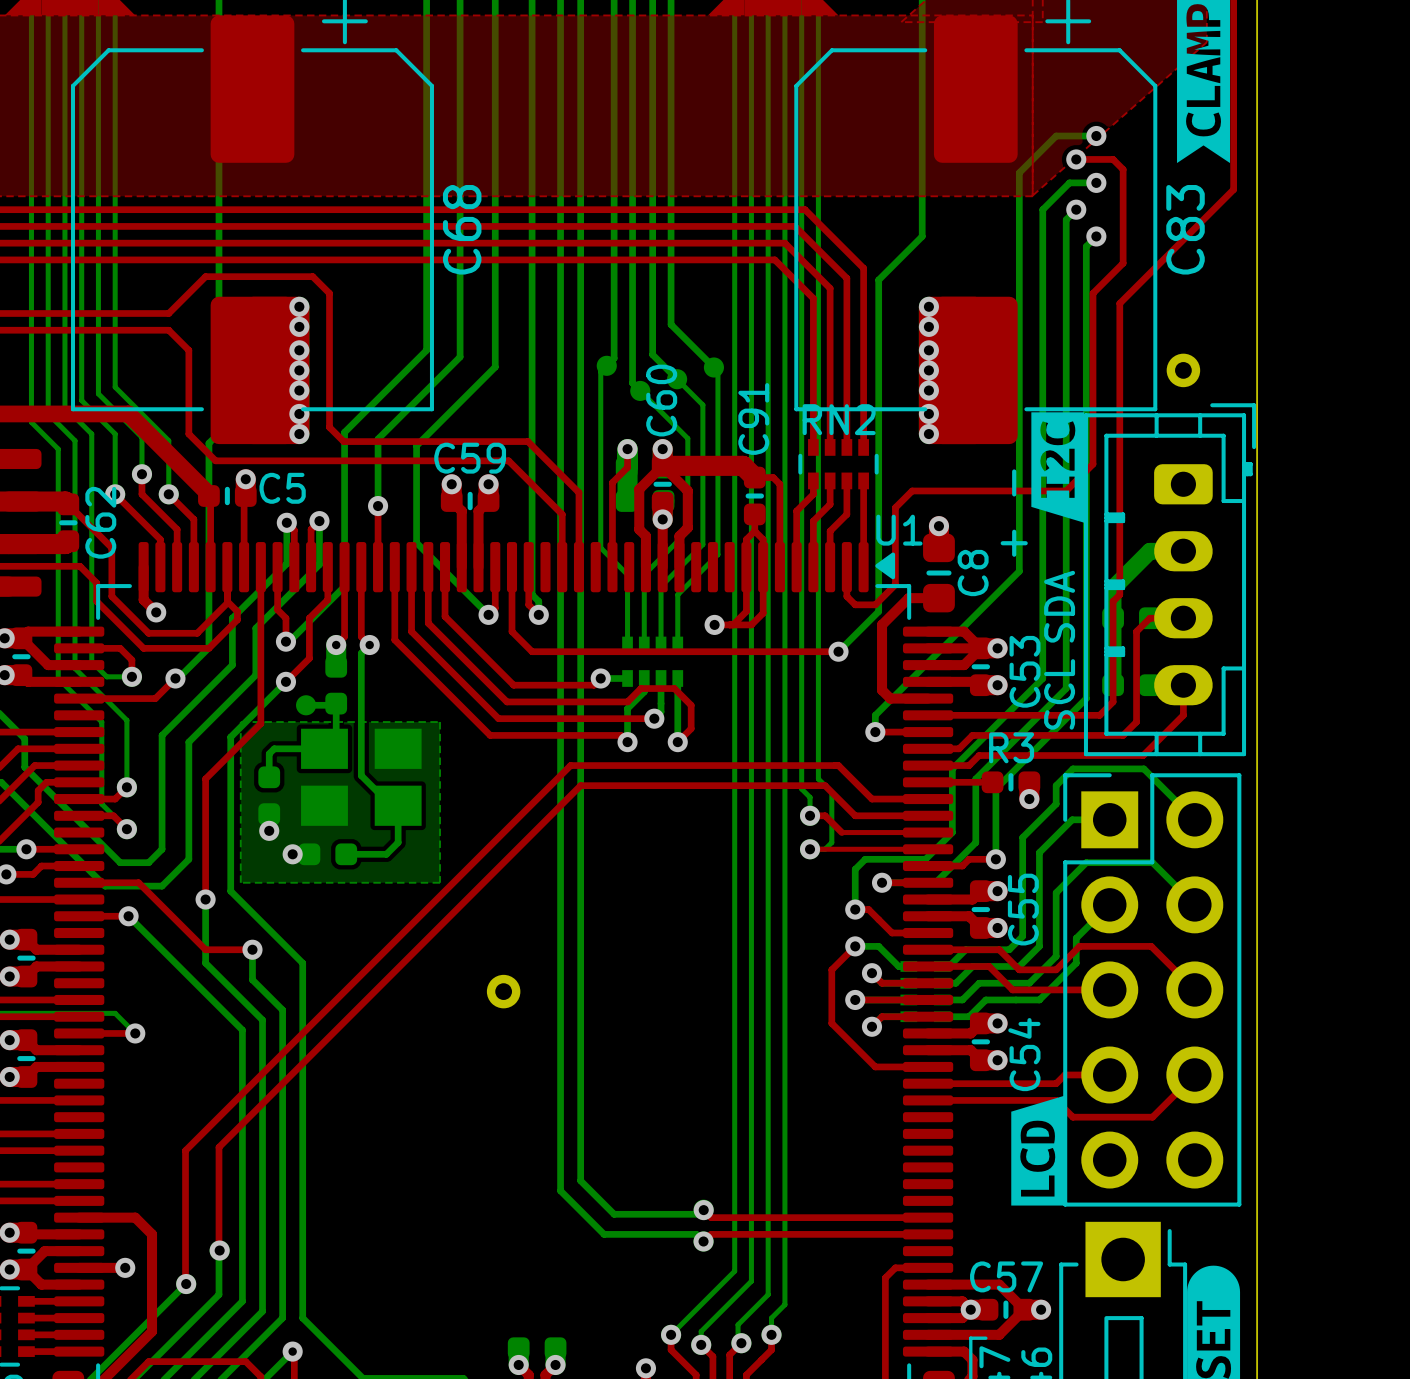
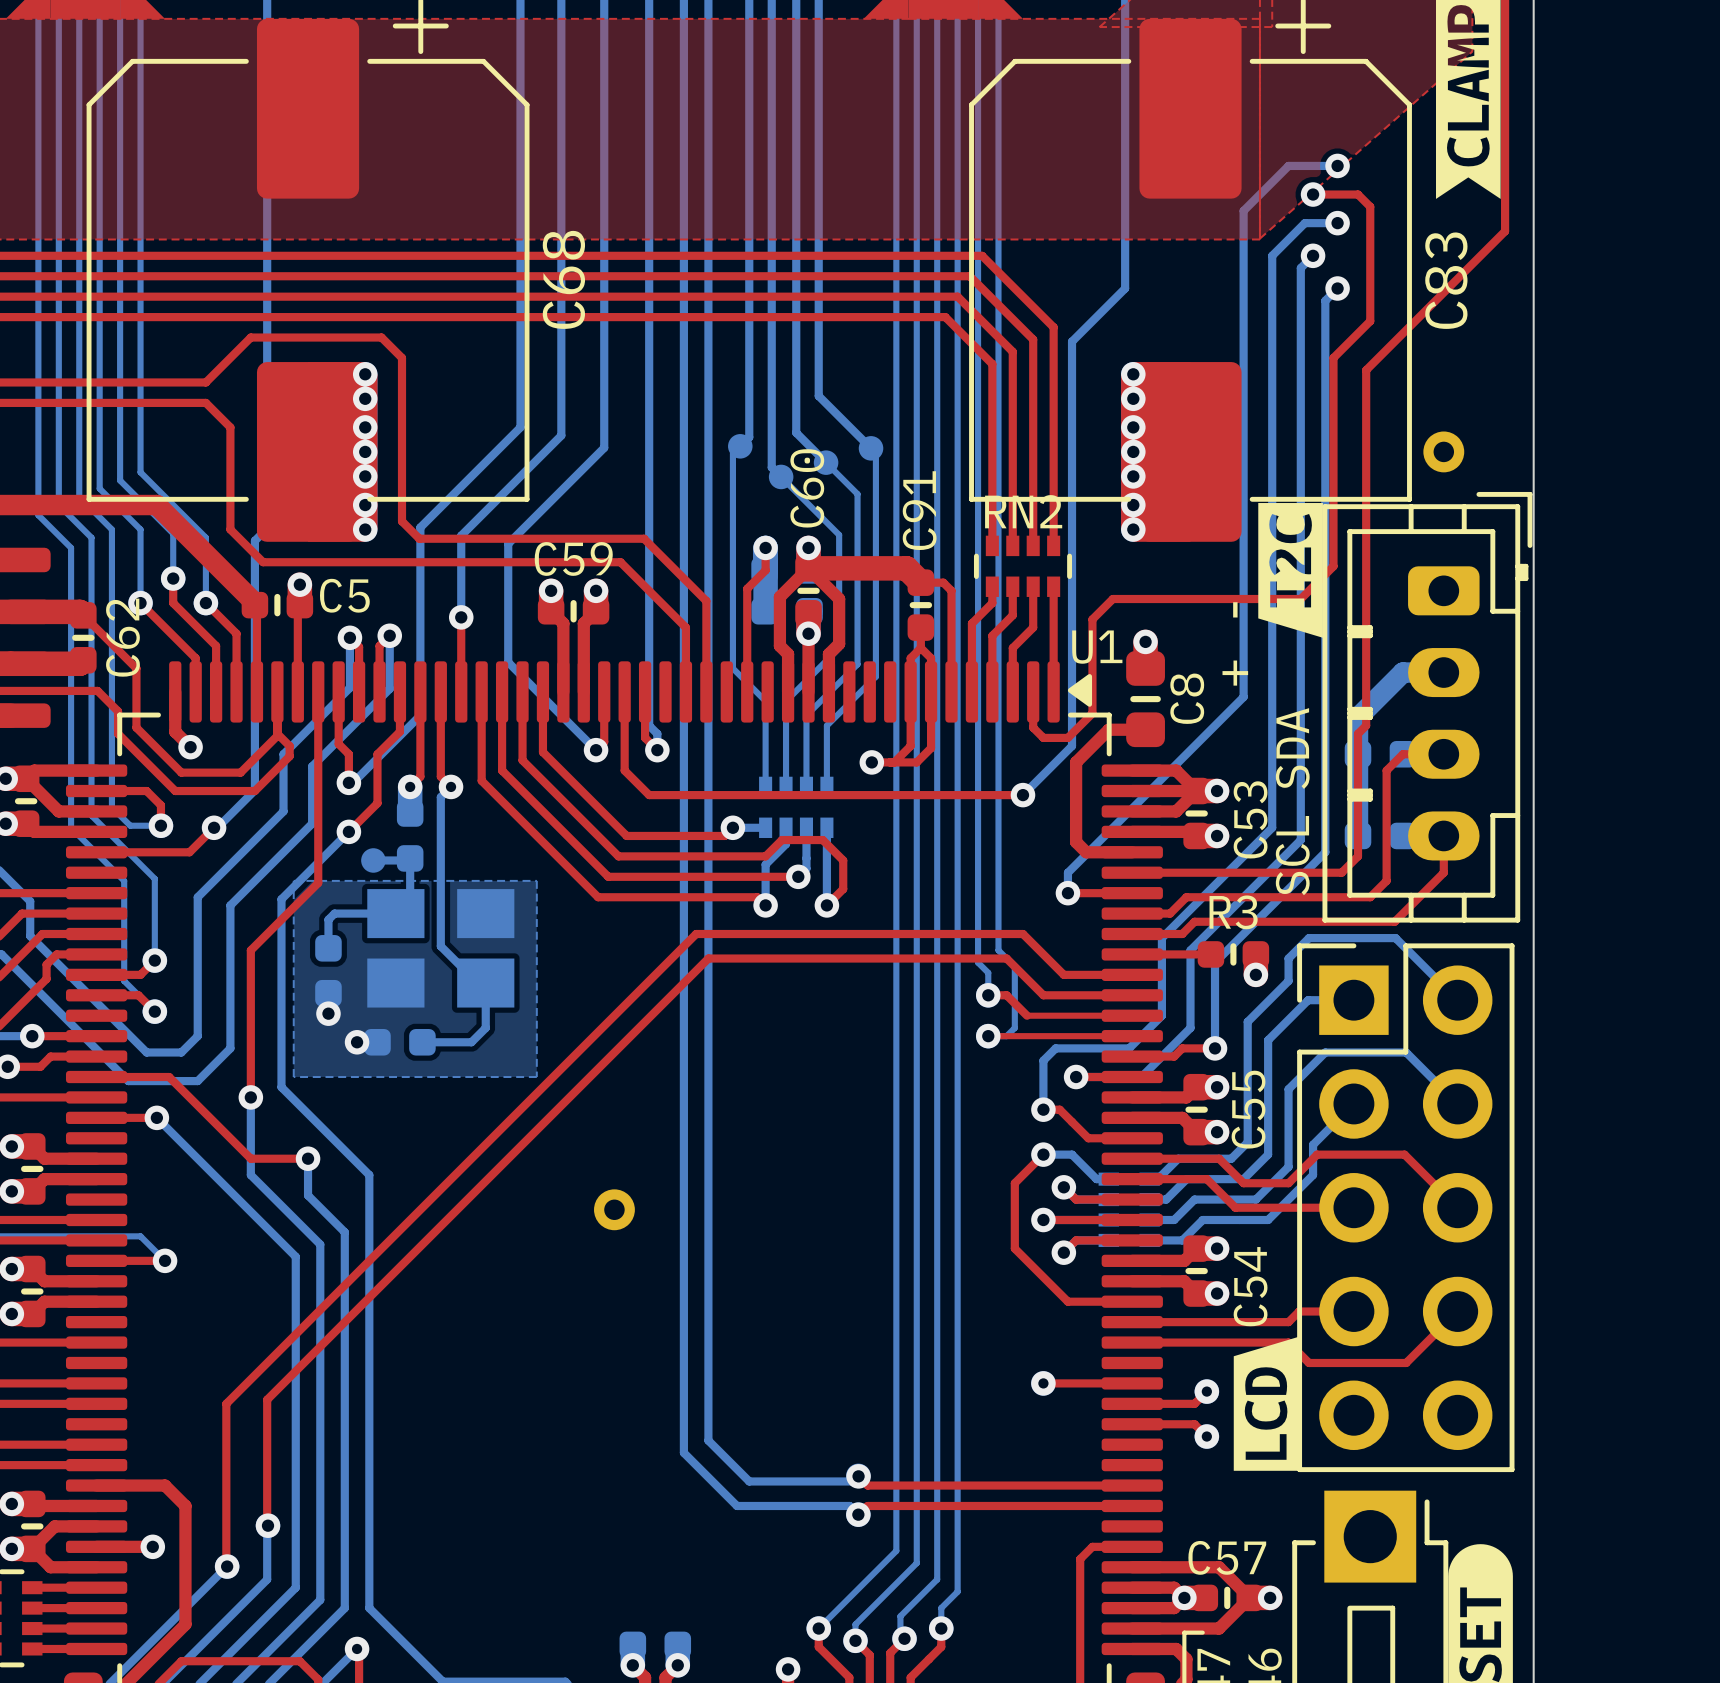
top track: none -> (1043, 1383) (1132, 1383)
via: none -> (1043, 1383)
top track: none -> (1206, 1391) (1194, 1403) (1132, 1403)
via: none -> (1206, 1391)
top track: none -> (1132, 1424) (1194, 1424) (1206, 1436)
via: none -> (1206, 1436)

